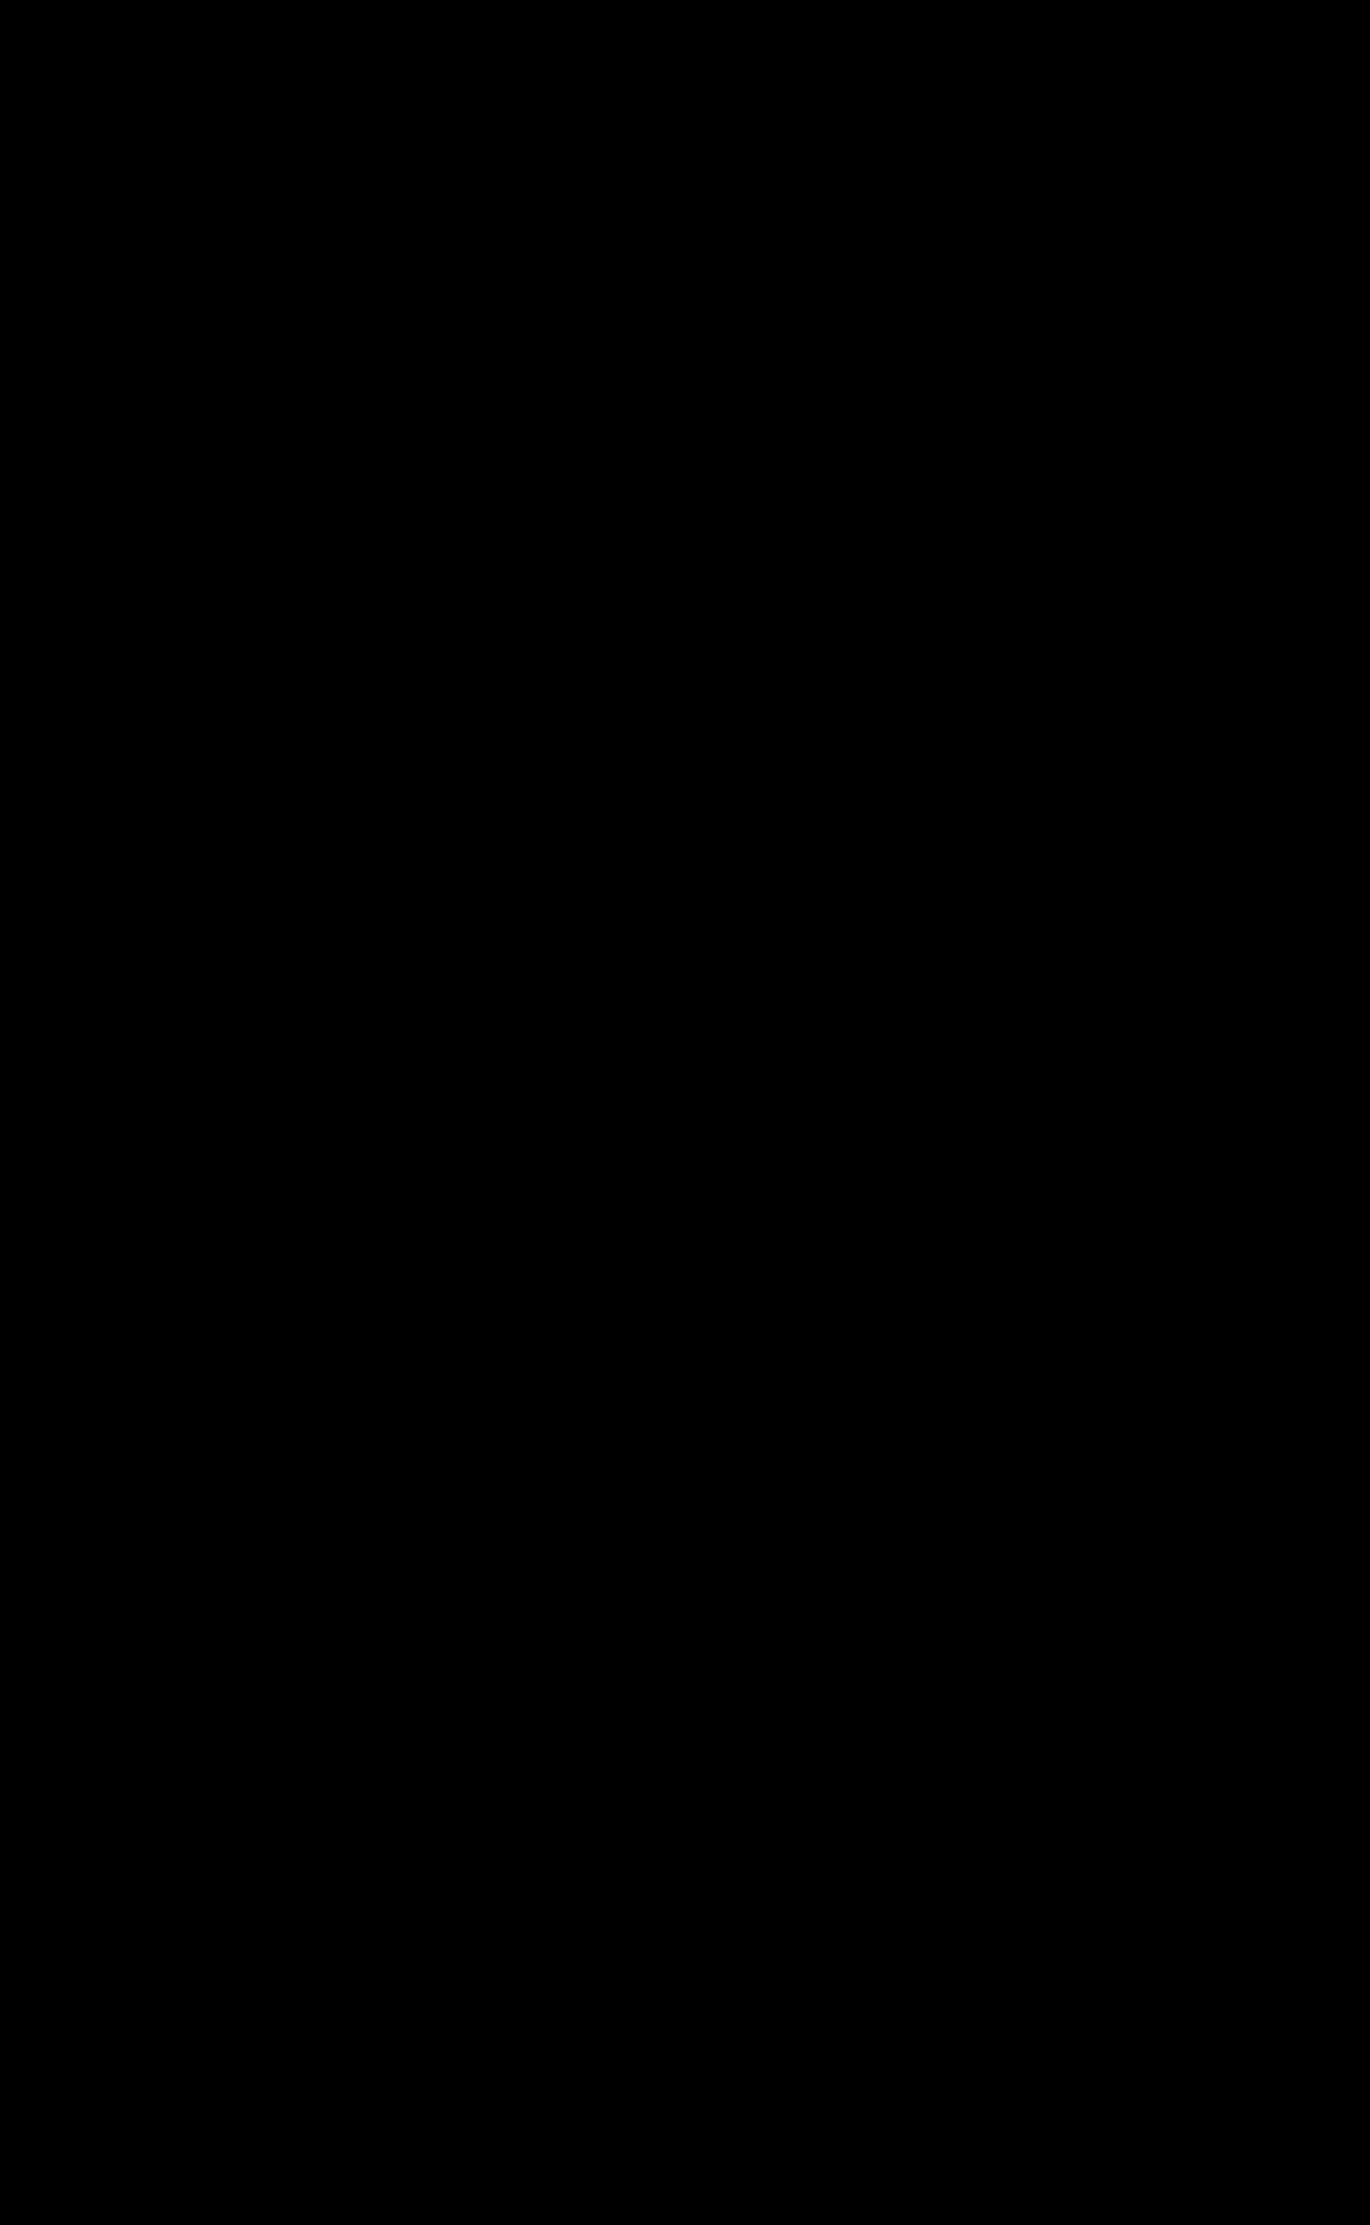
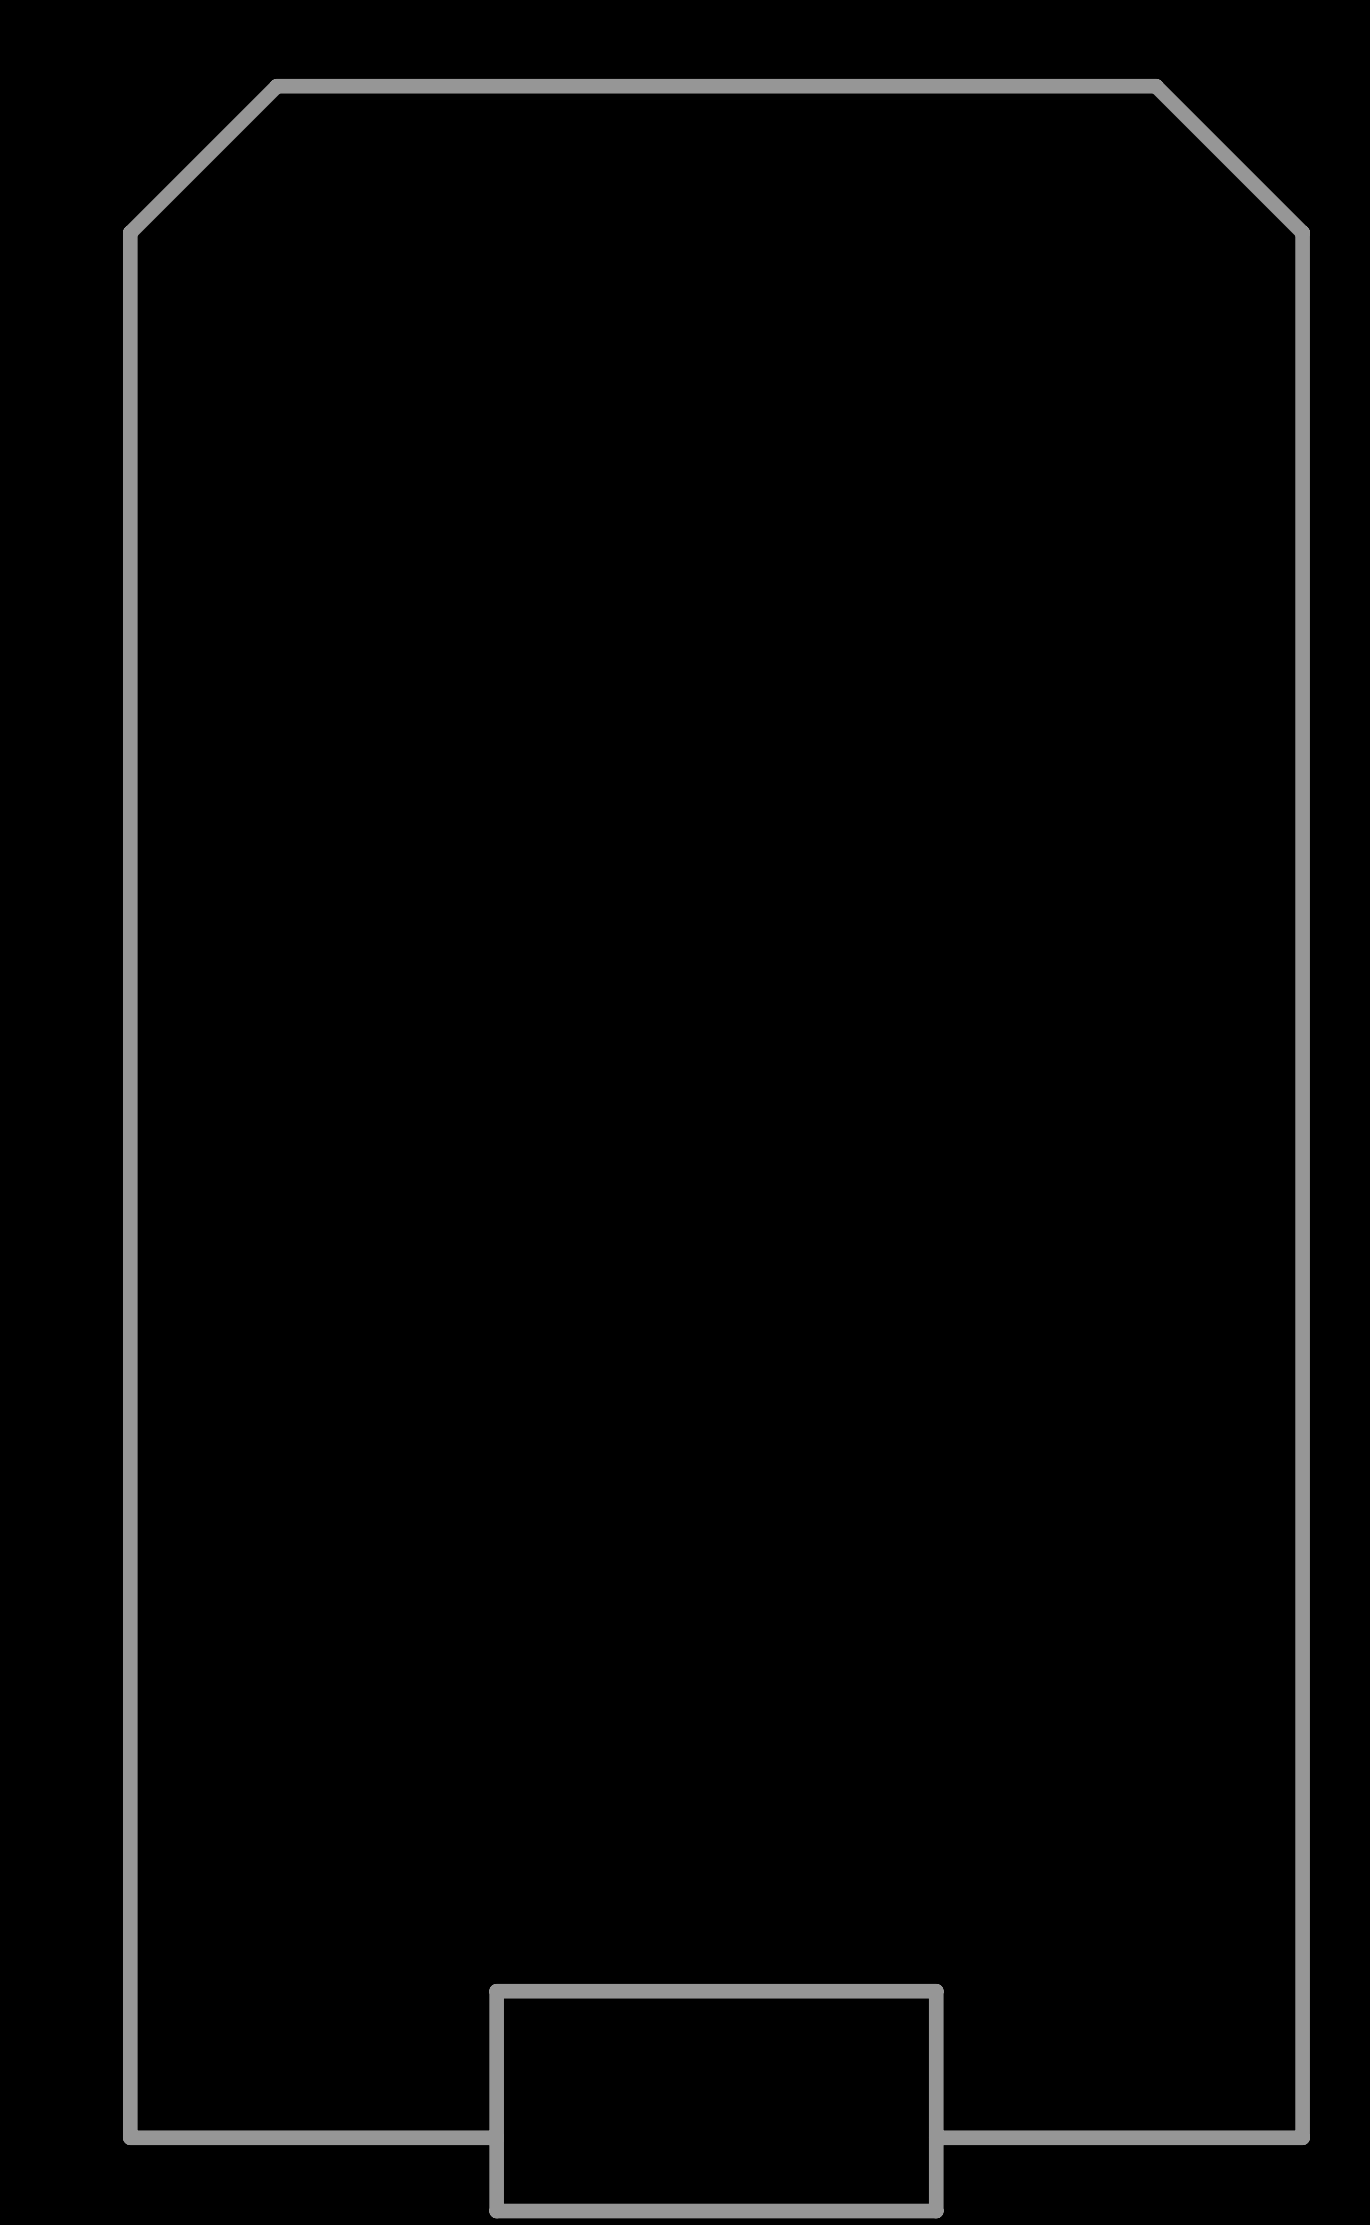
line: none -> (496, 1991) (496, 2211) (936, 2211) (936, 1991) (496, 1991)
line: none -> (496, 2137) (130, 2137) (130, 232) (276, 86) (1156, 86) (1302, 232) (1302, 2137) (936, 2137)

